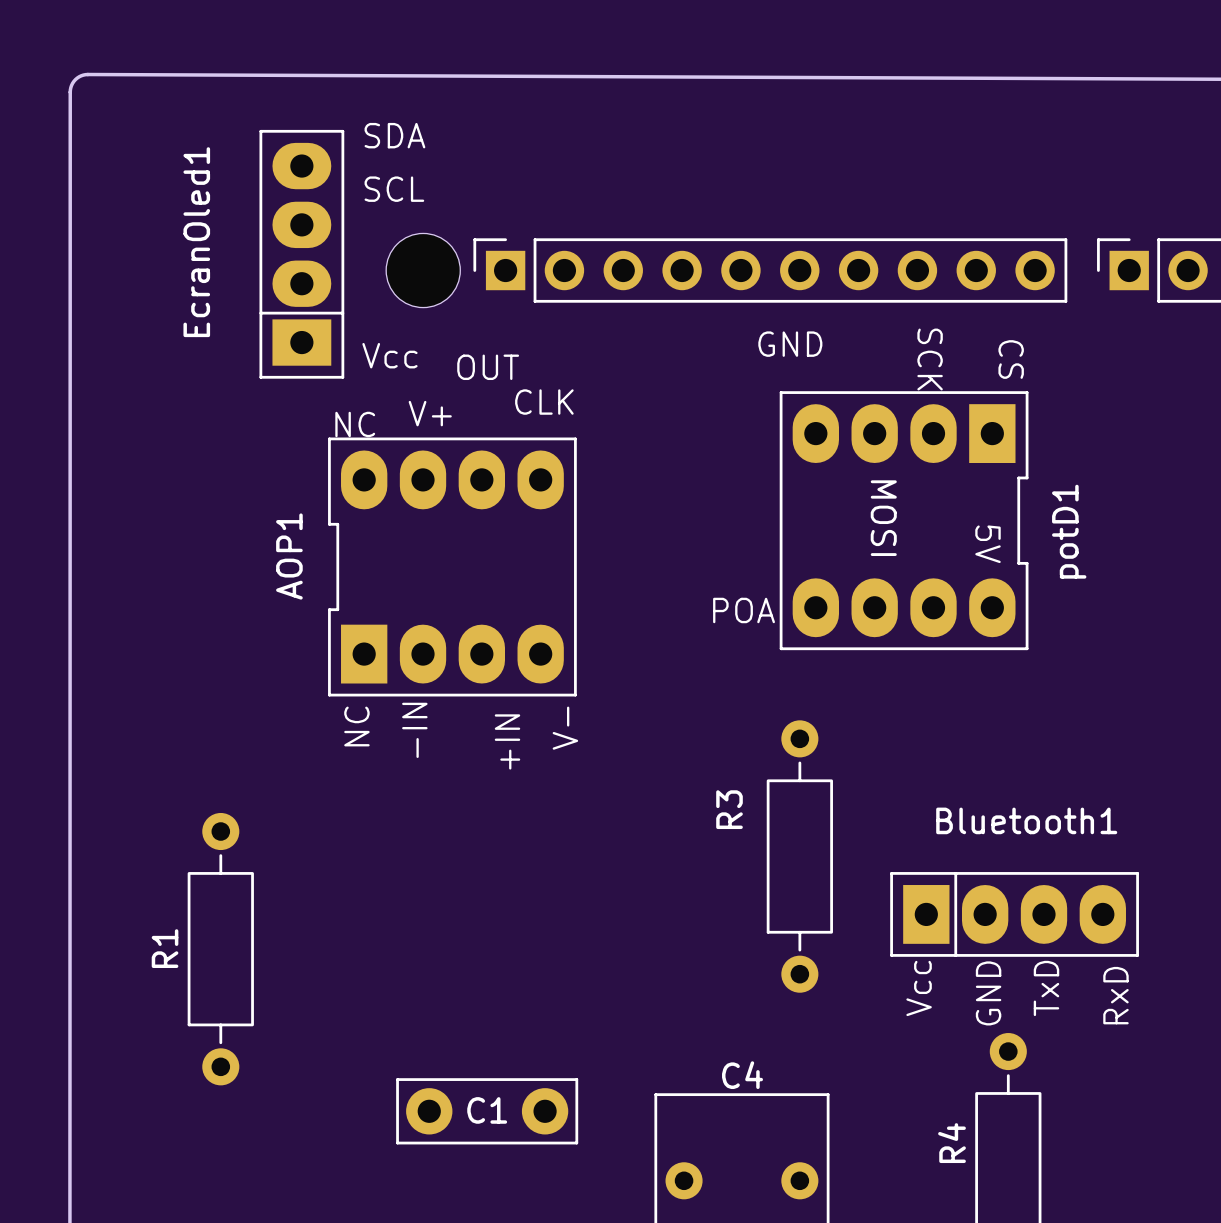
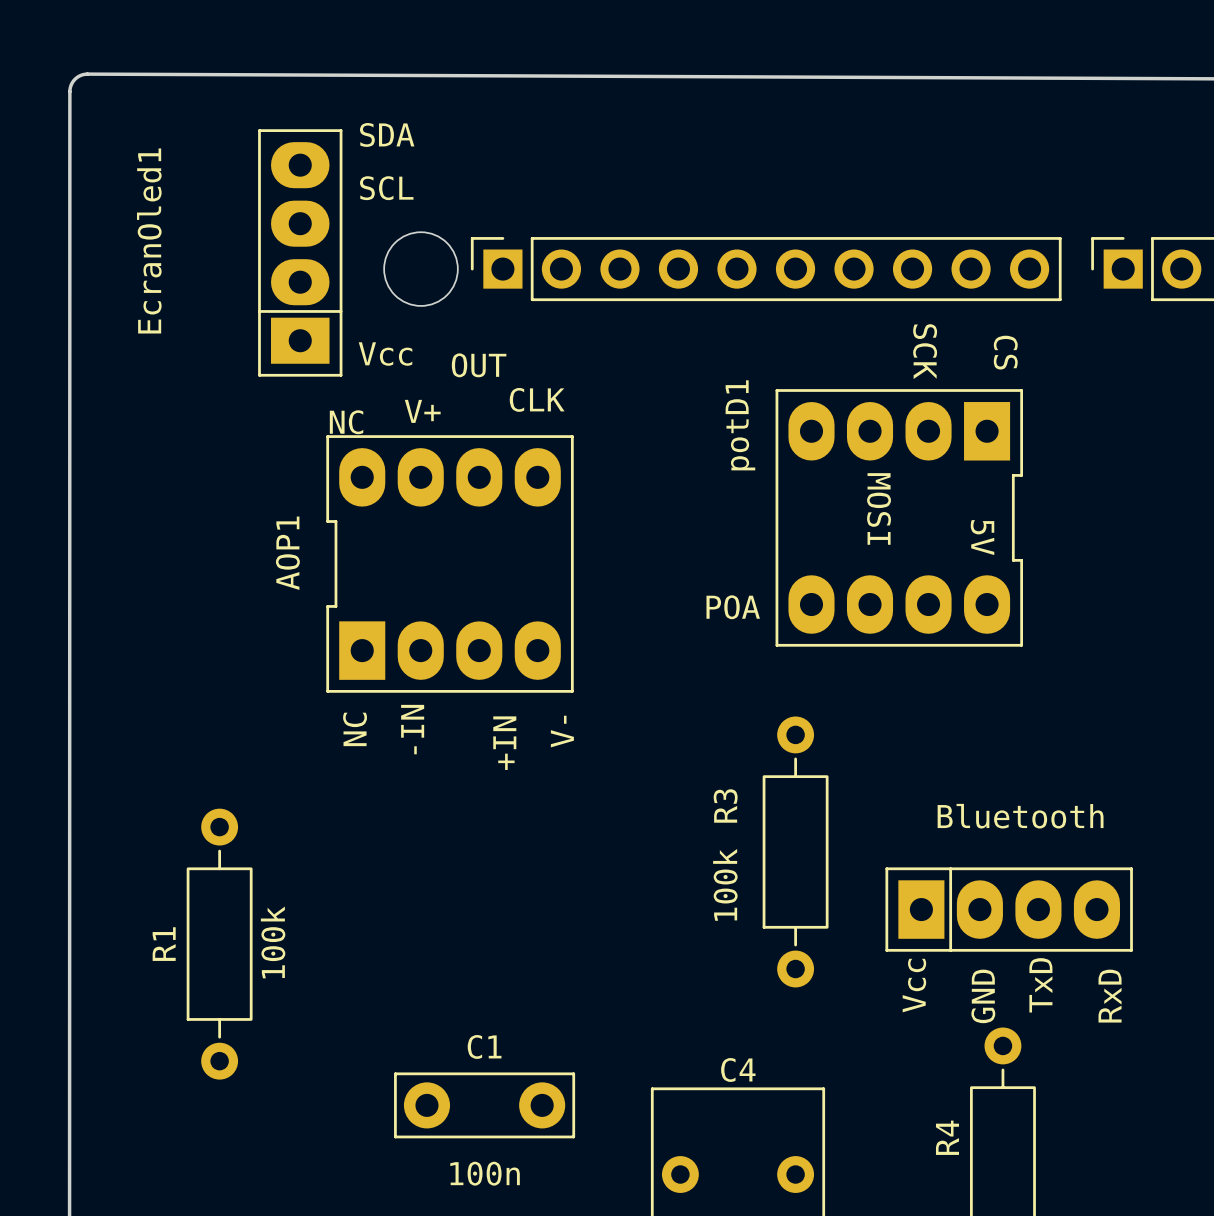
EcranOled1 name position: EcranOled1 (196, 242) -> EcranOled1 (149, 240)
potD1 text: GND (790, 344) -> none
potD1 name position: potD1 (1069, 531) -> potD1 (740, 425)
Bluetooth1 name: Bluetooth1 (1026, 820) -> Bluetooth (1020, 816)
R3 value: none -> 100k (725, 884)
R1 value: none -> 100k (273, 942)
C1 name position: C1 (487, 1110) -> C1 (484, 1046)
C1 value: none -> 100n (485, 1173)

